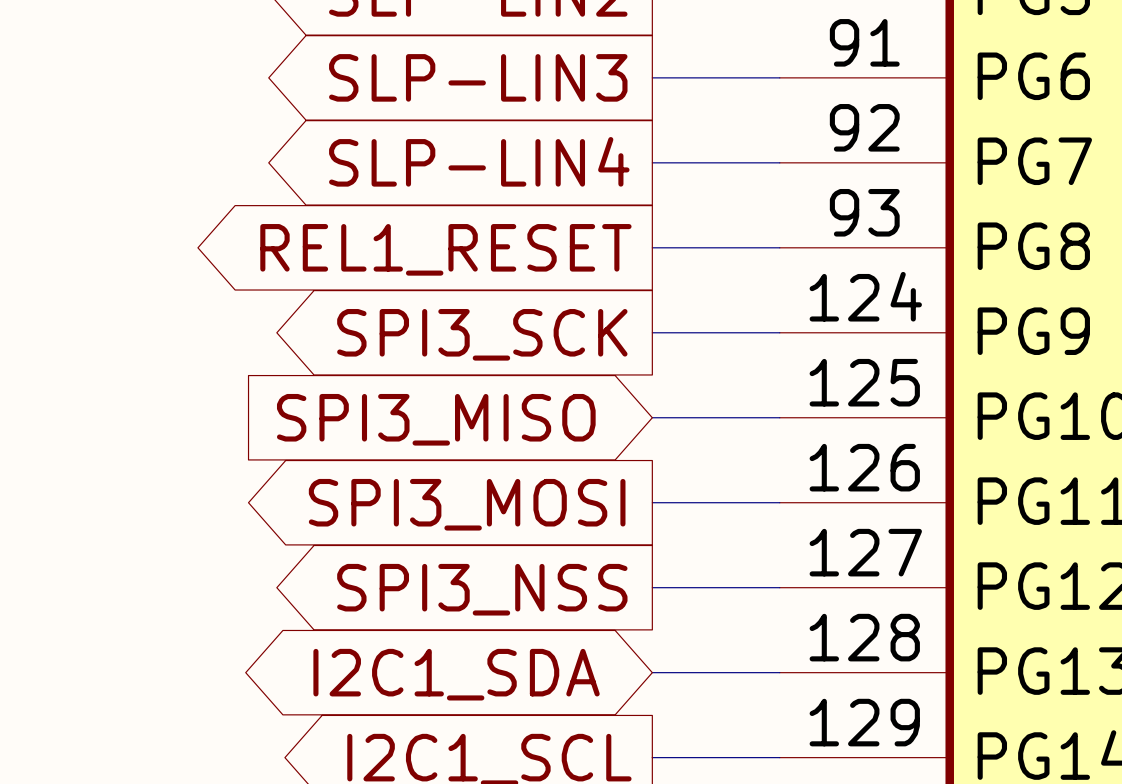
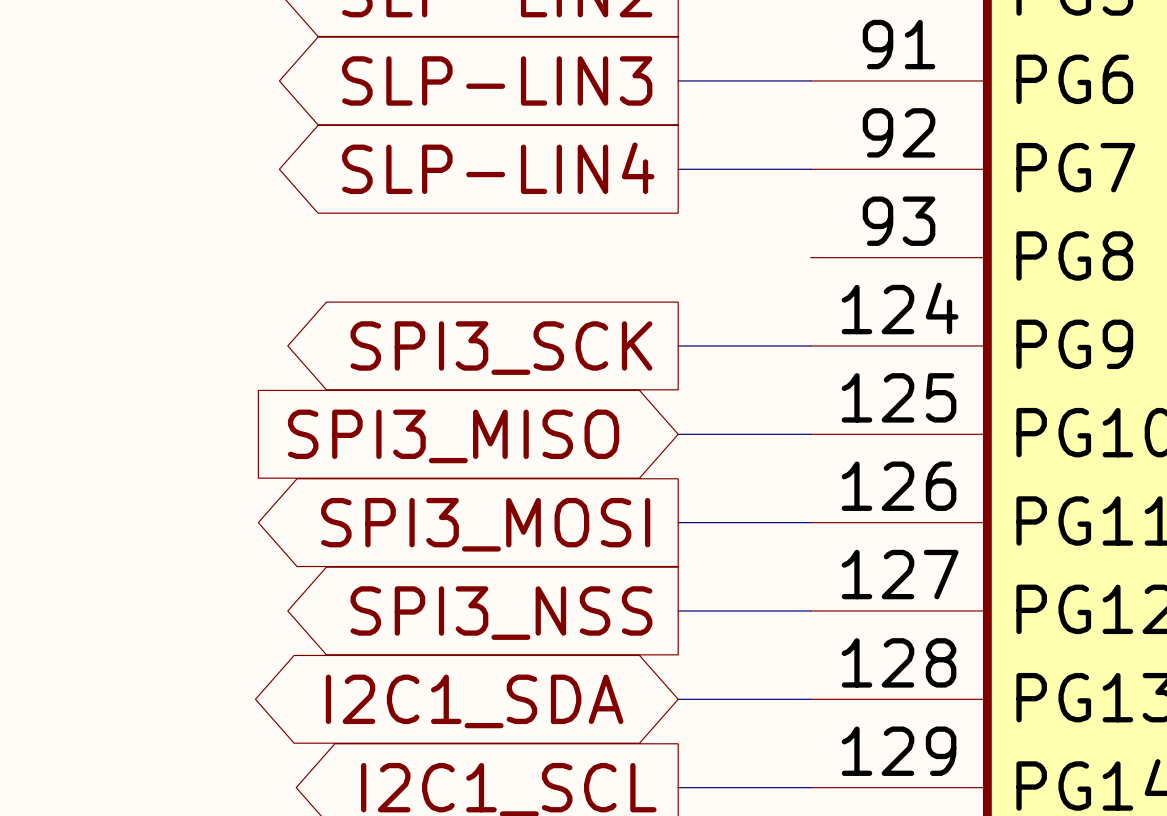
wire: (652, 247) (779, 247) -> none
global label: REL1_RESET (445, 249) -> none

